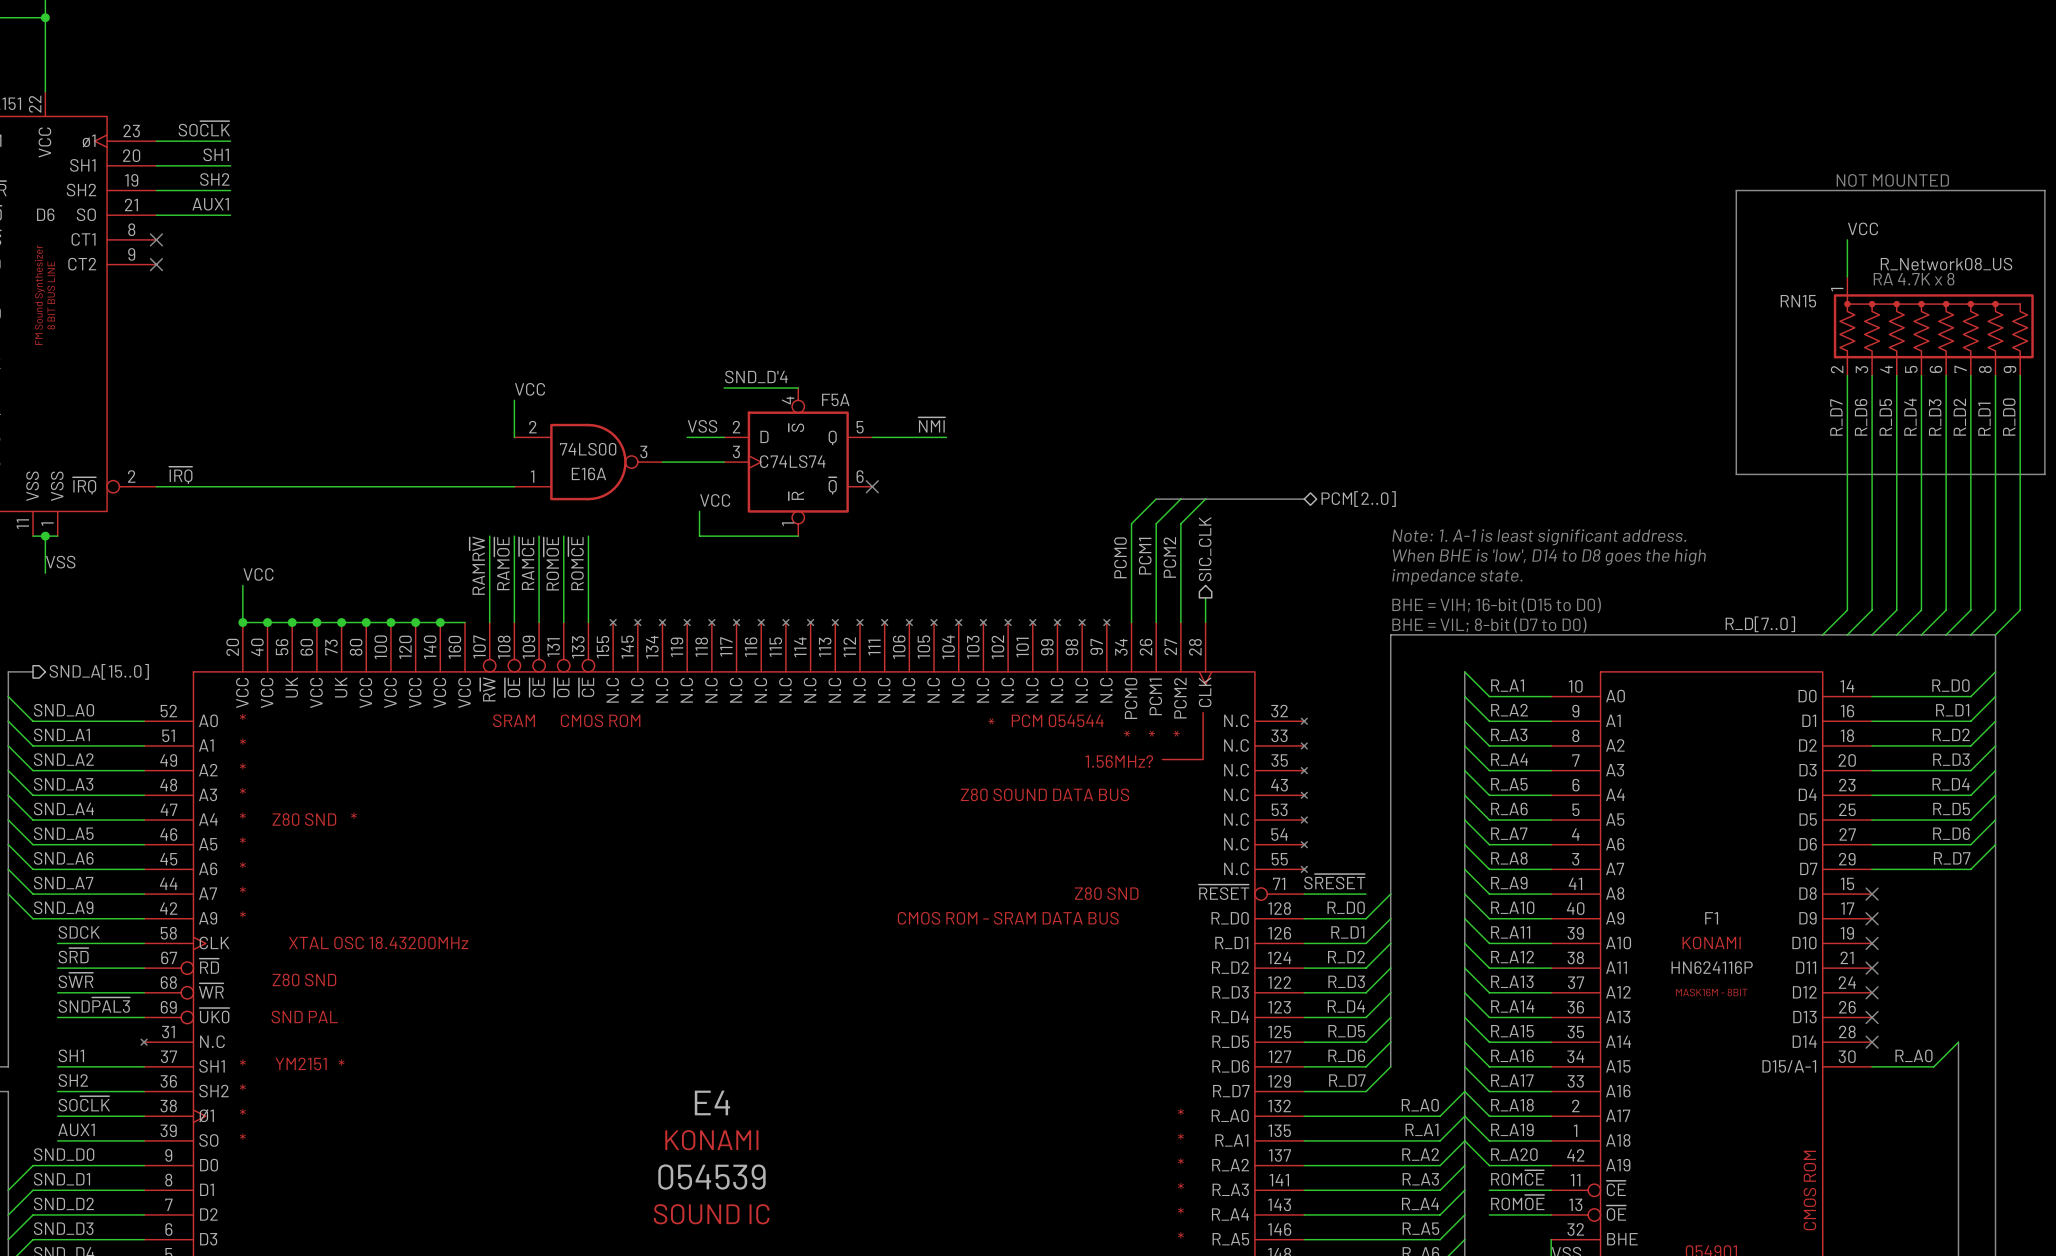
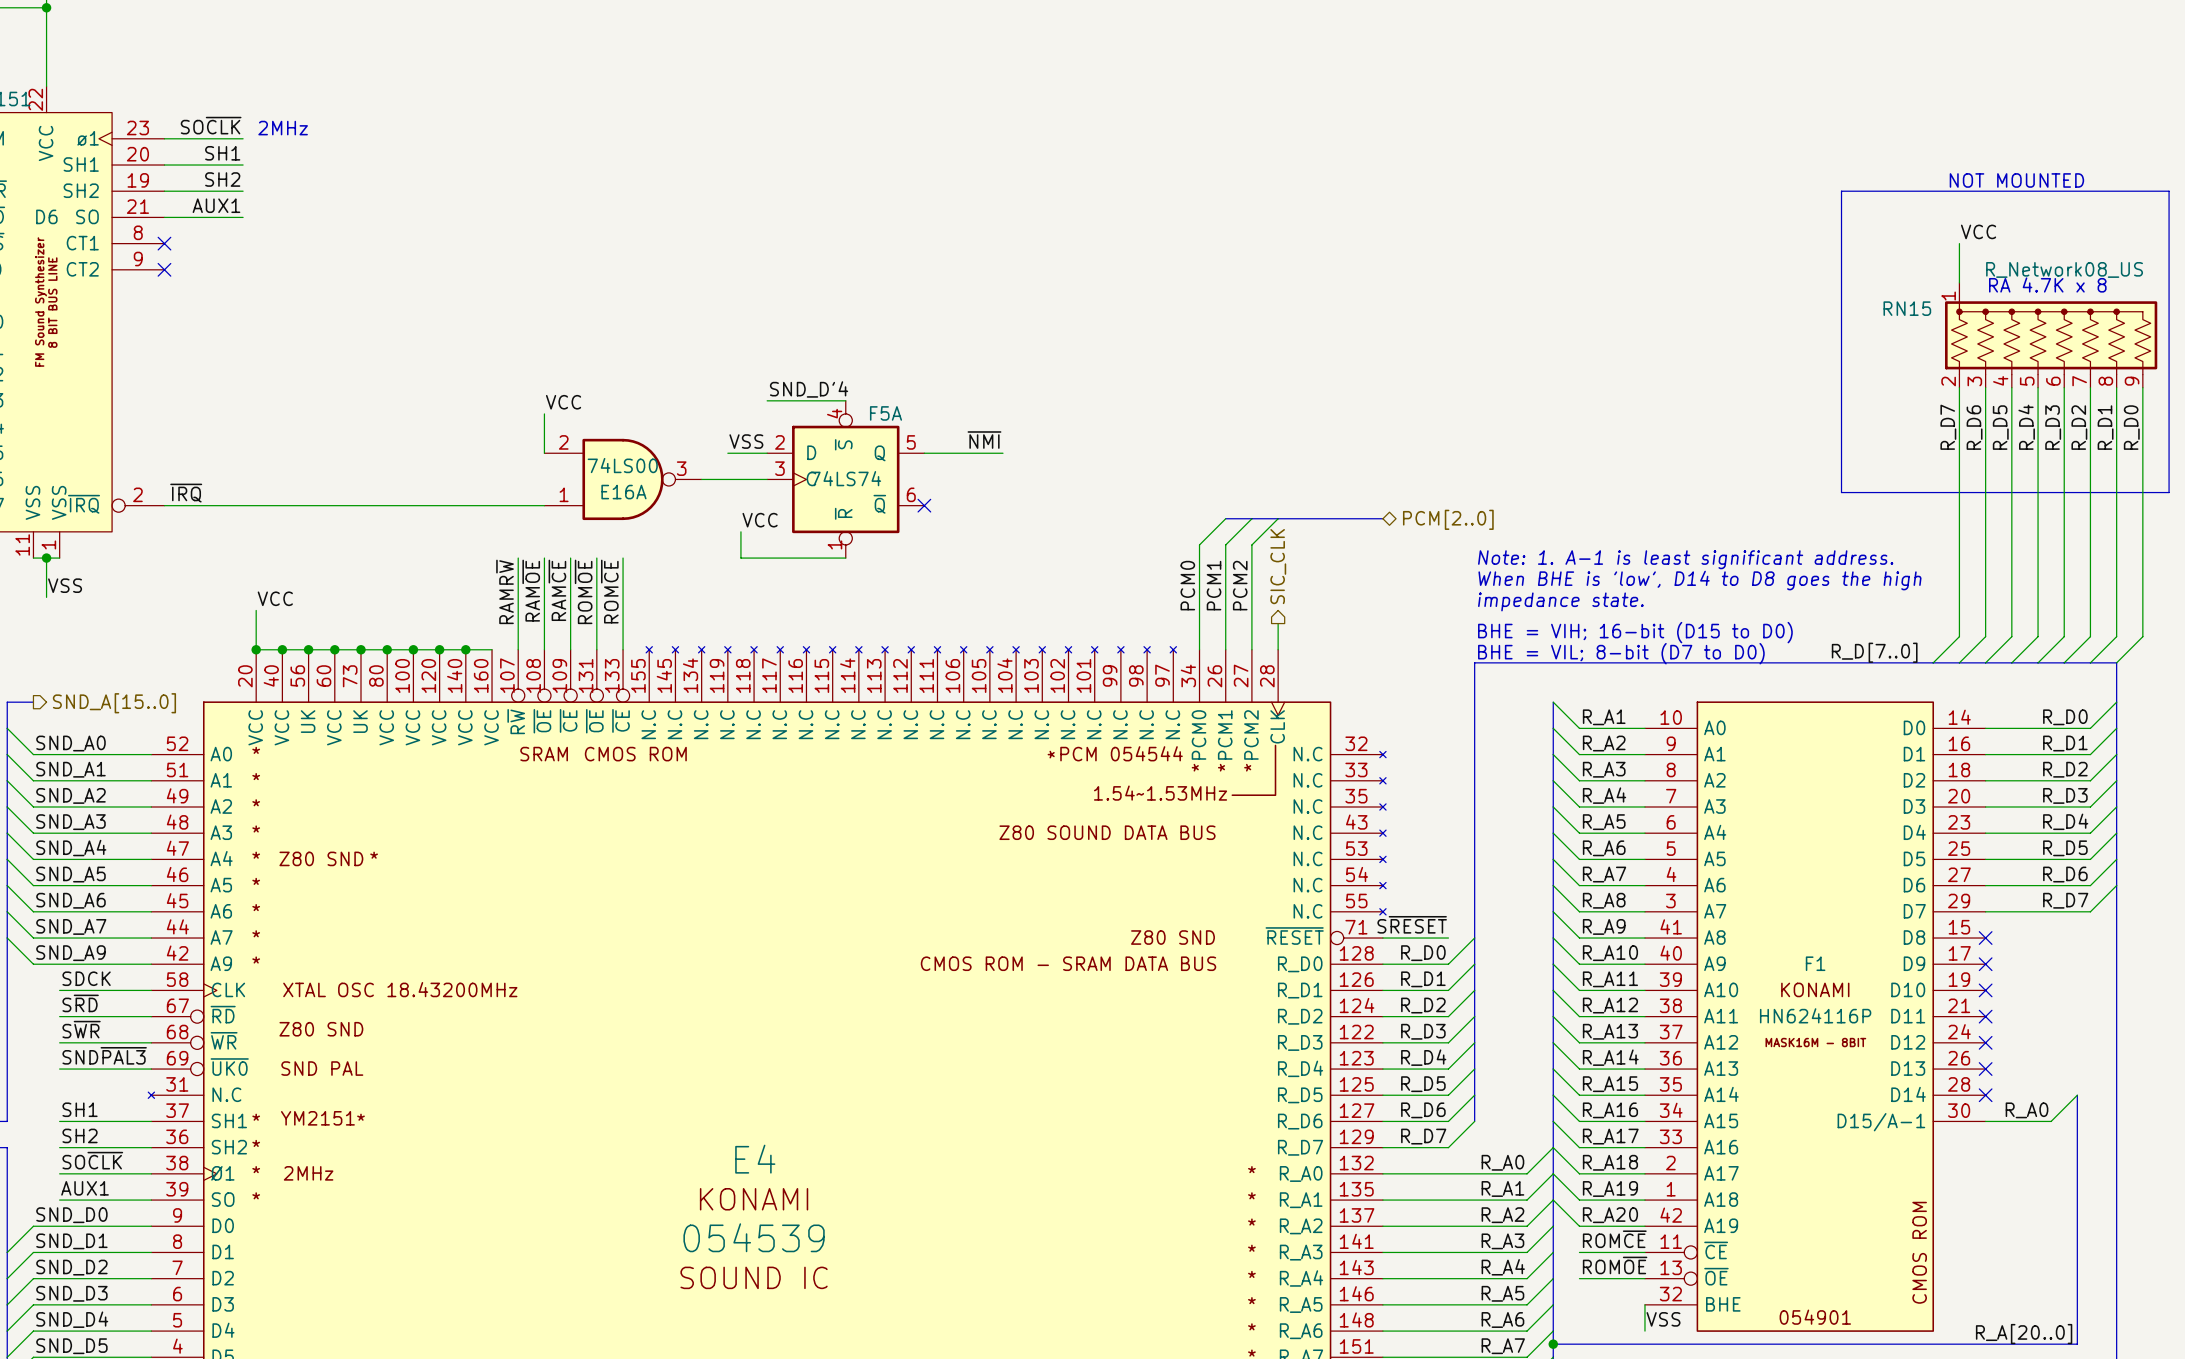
text: none -> 2MHz (283, 128)
E4 text: none -> 1.54~1.53MHz (1160, 793)
E4 text: 1.56MHz? (1119, 761) -> none
E4 text: none -> 2MHz (308, 1173)

